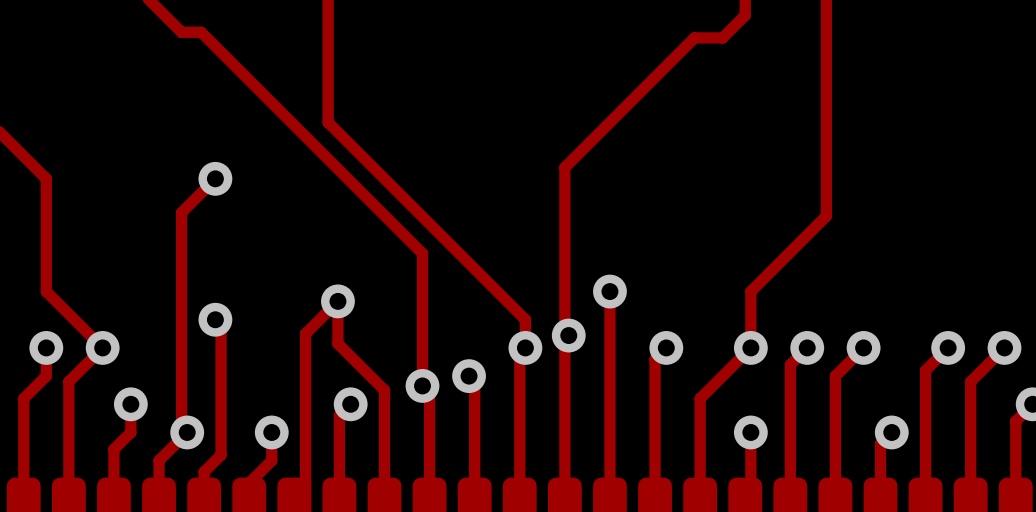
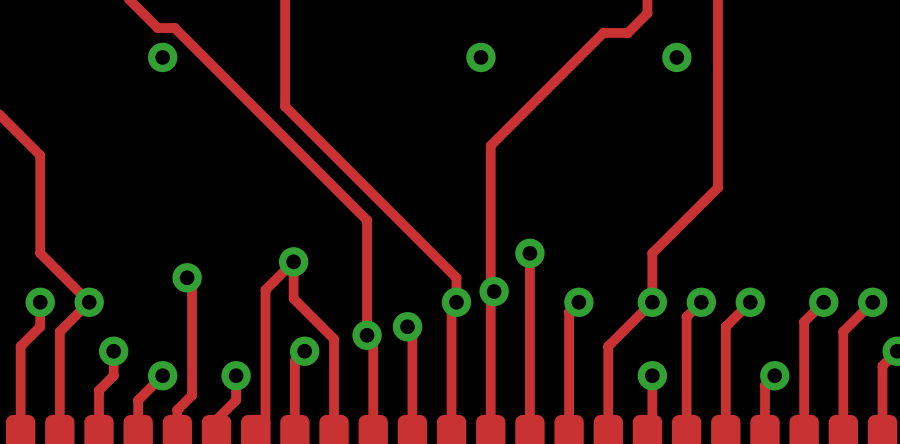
via: none -> (480, 57)
via: none -> (676, 57)
track: (215, 178) (181, 212) (181, 426) (187, 432) -> none
via position: (215, 178) -> (162, 57)

